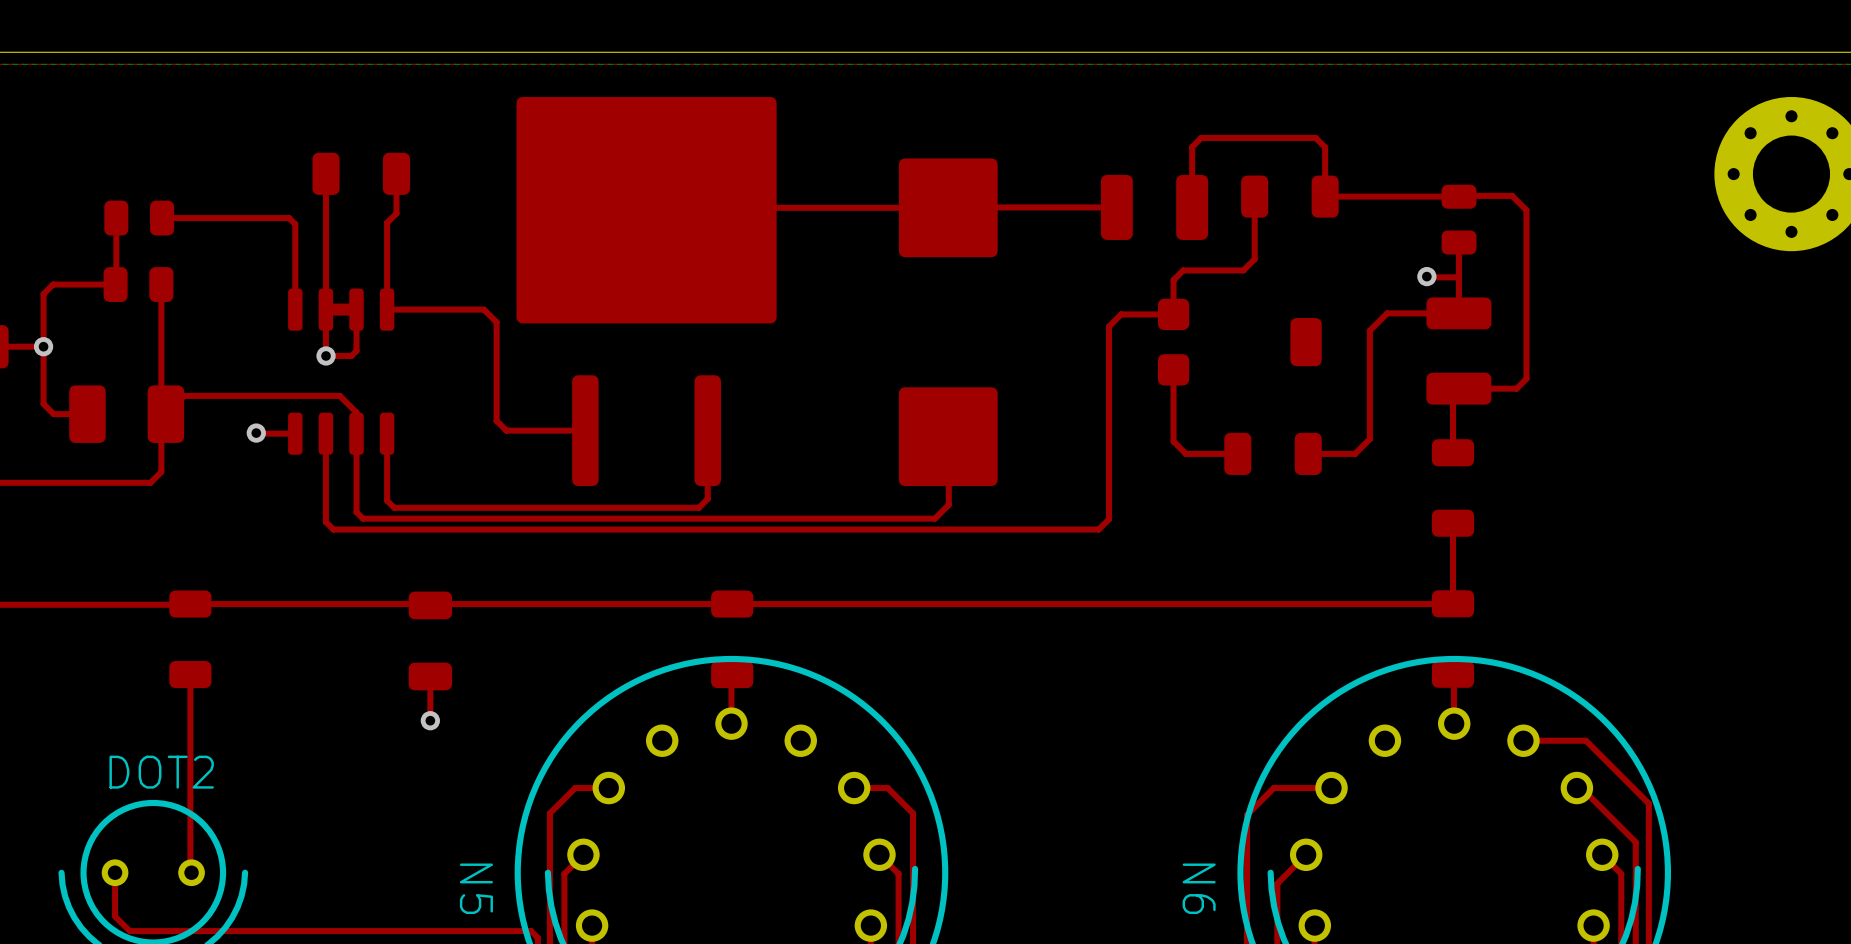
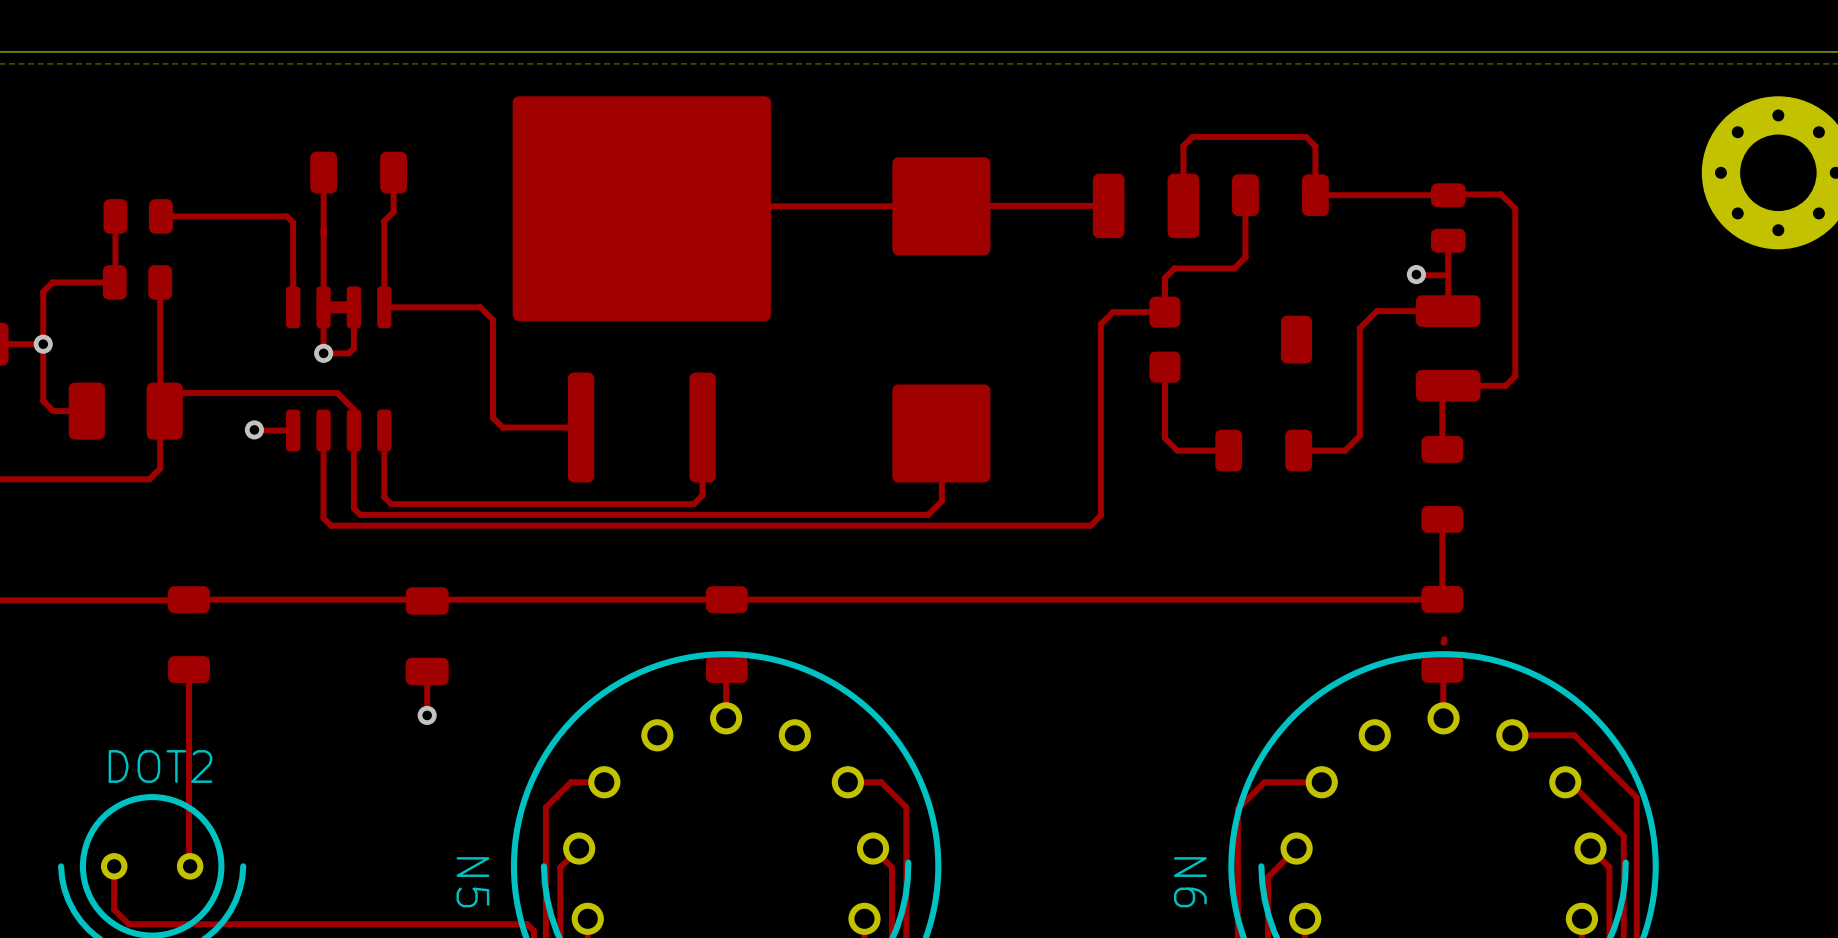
top track: none -> (1444, 639) (1443, 642)

